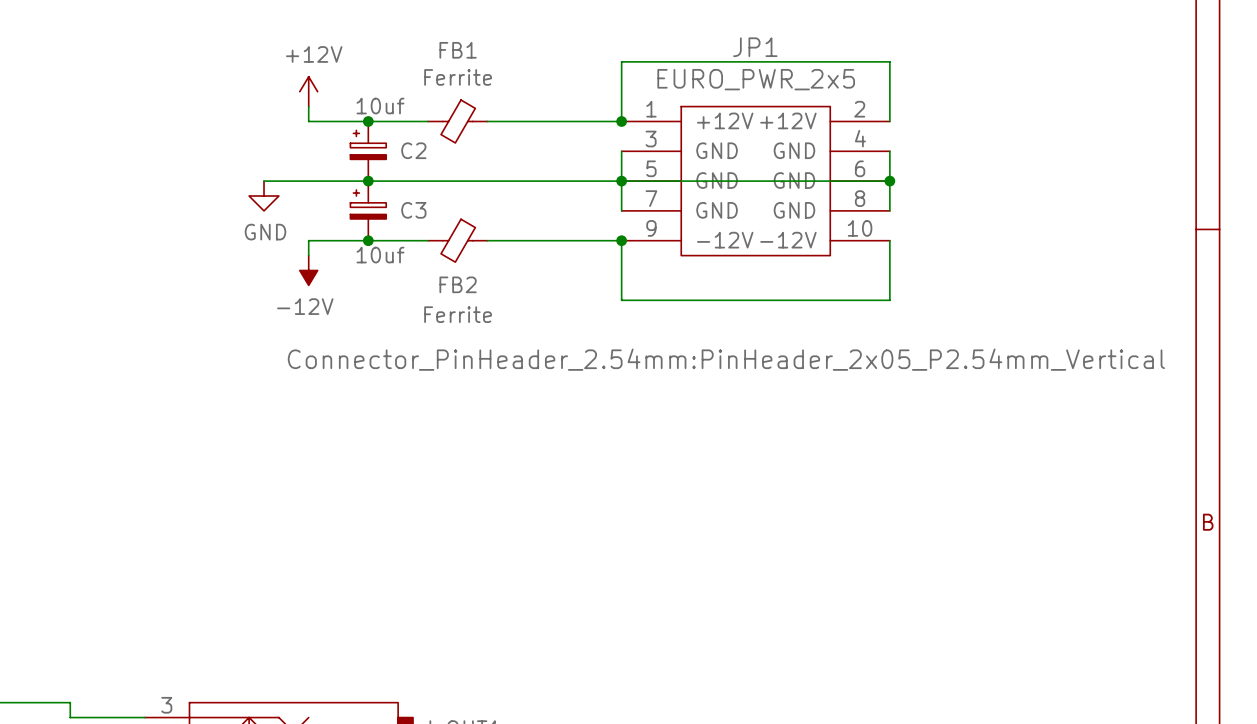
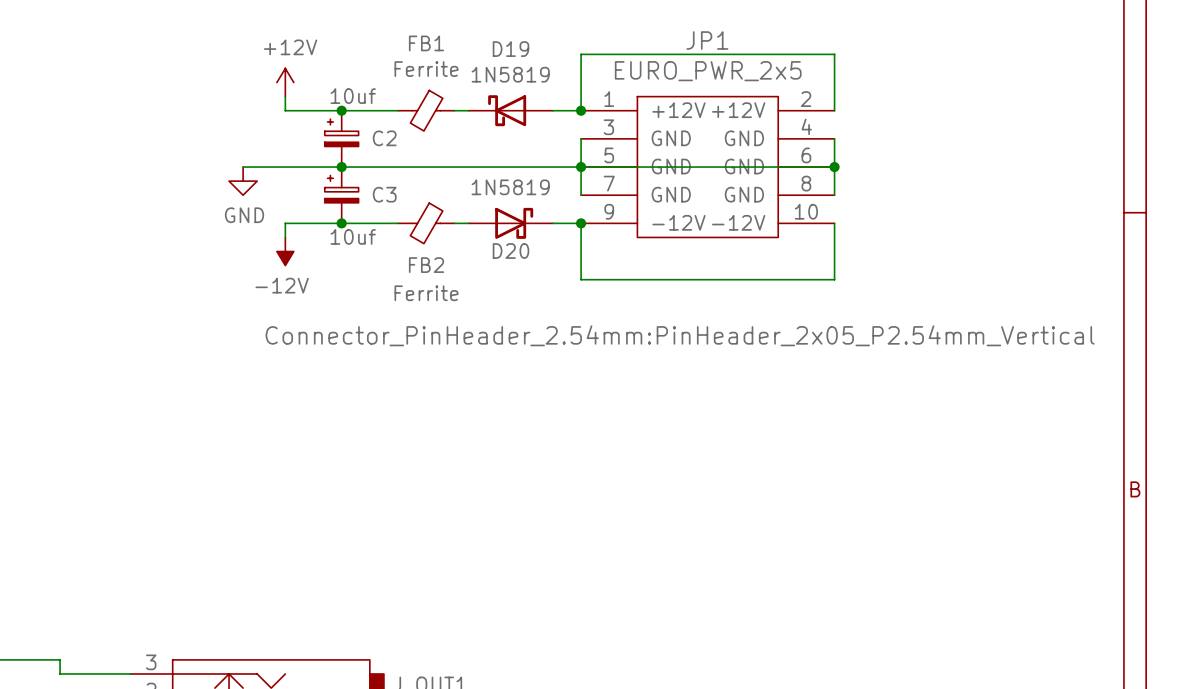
D19: none -> 1N5819 (510, 110)
D20: none -> 1N5819 (510, 223)

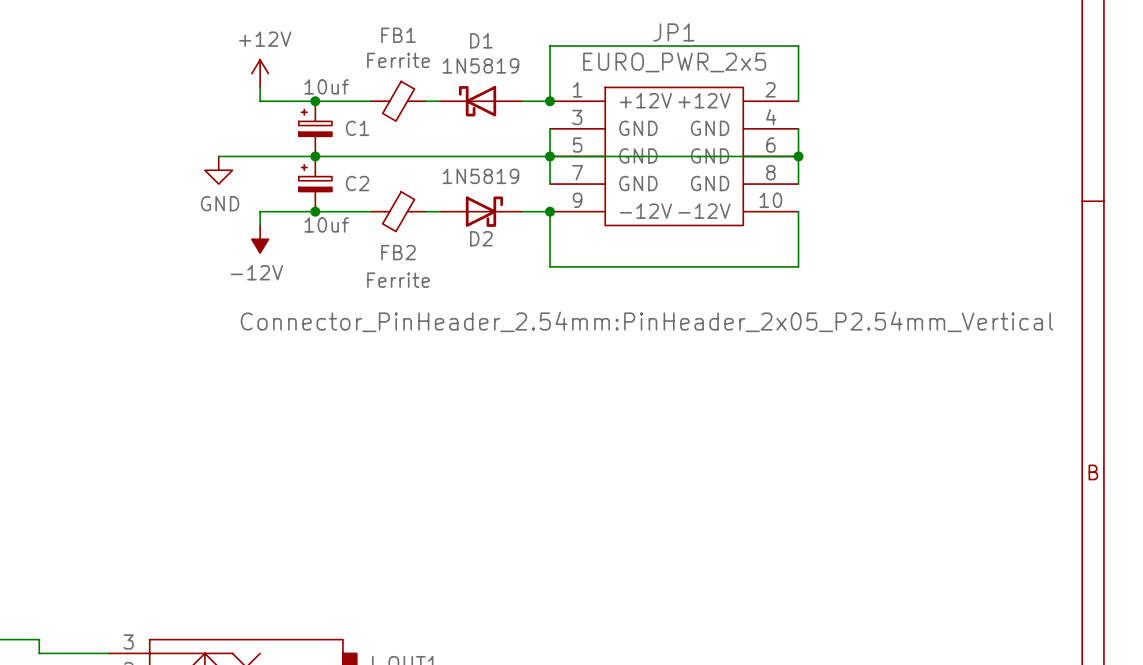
D19 name: D19 (511, 49) -> D1 (481, 40)
C2 name: C2 (384, 138) -> C1 (357, 128)
C3 name: C3 (384, 194) -> C2 (357, 183)
D20 name: D20 (511, 251) -> D2 (481, 238)

